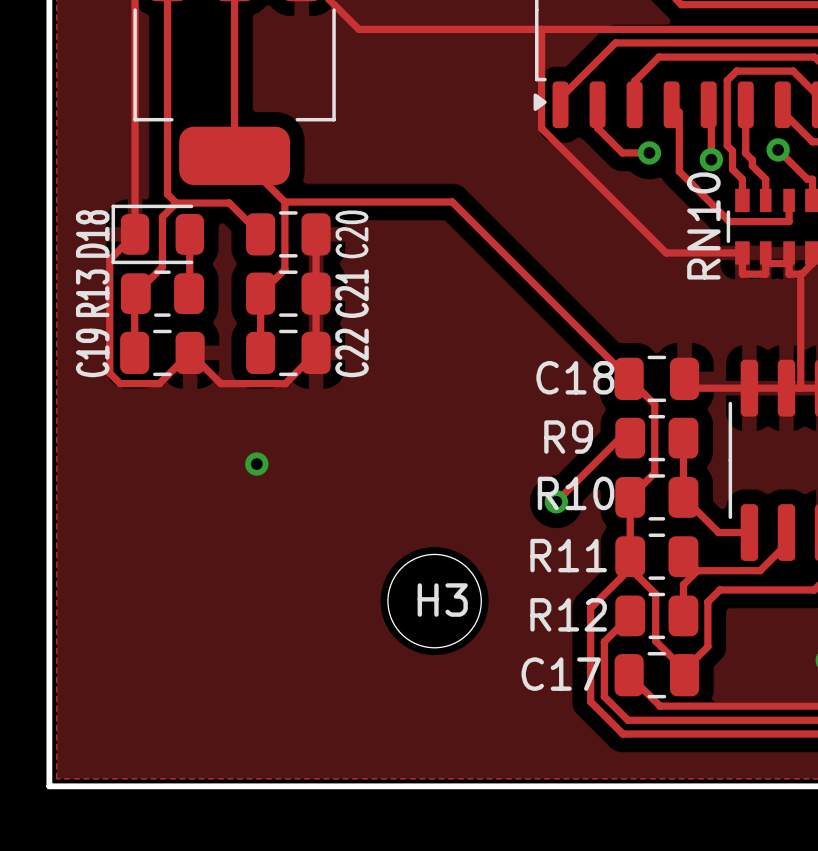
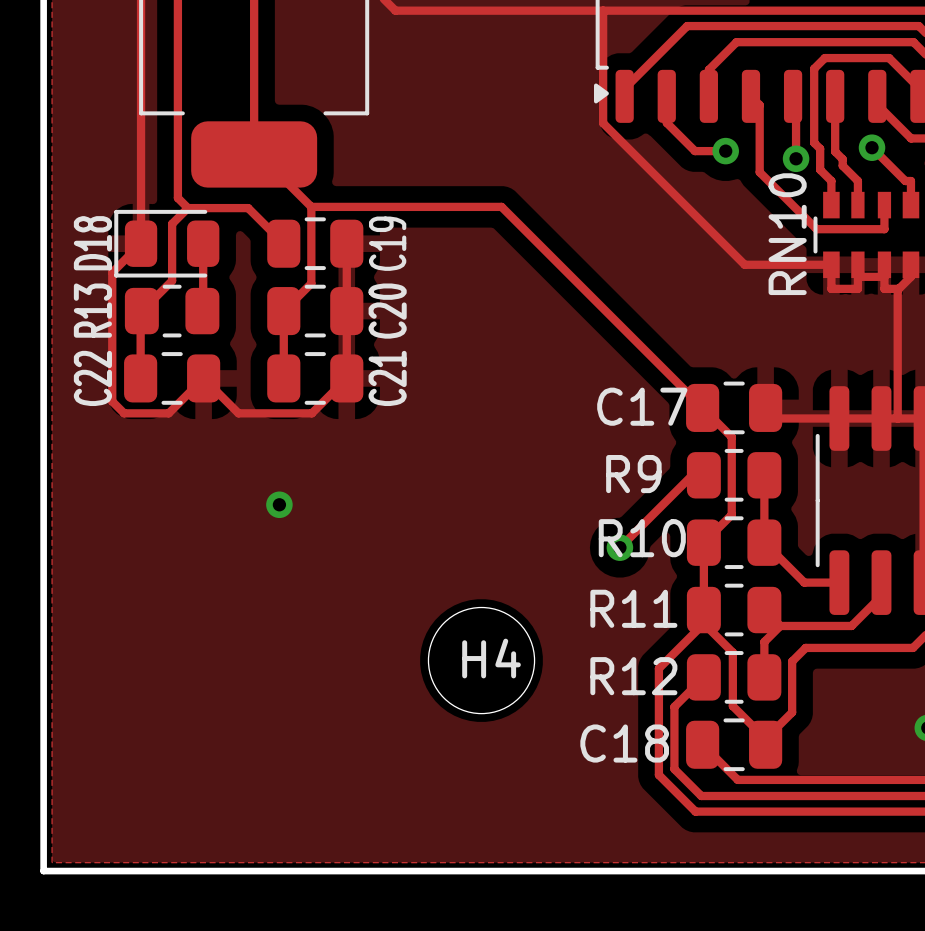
C20 name: C20 (352, 234) -> C19 (387, 243)
C21 name: C21 (352, 293) -> C20 (387, 311)
C19 name: C19 (92, 352) -> C22 (92, 378)
C22 name: C22 (352, 352) -> C21 (387, 378)
C18 name: C18 (575, 377) -> C17 (642, 406)
H3 name: H3 (442, 600) -> H4 (491, 658)
C17 name: C17 (561, 674) -> C18 (624, 743)

